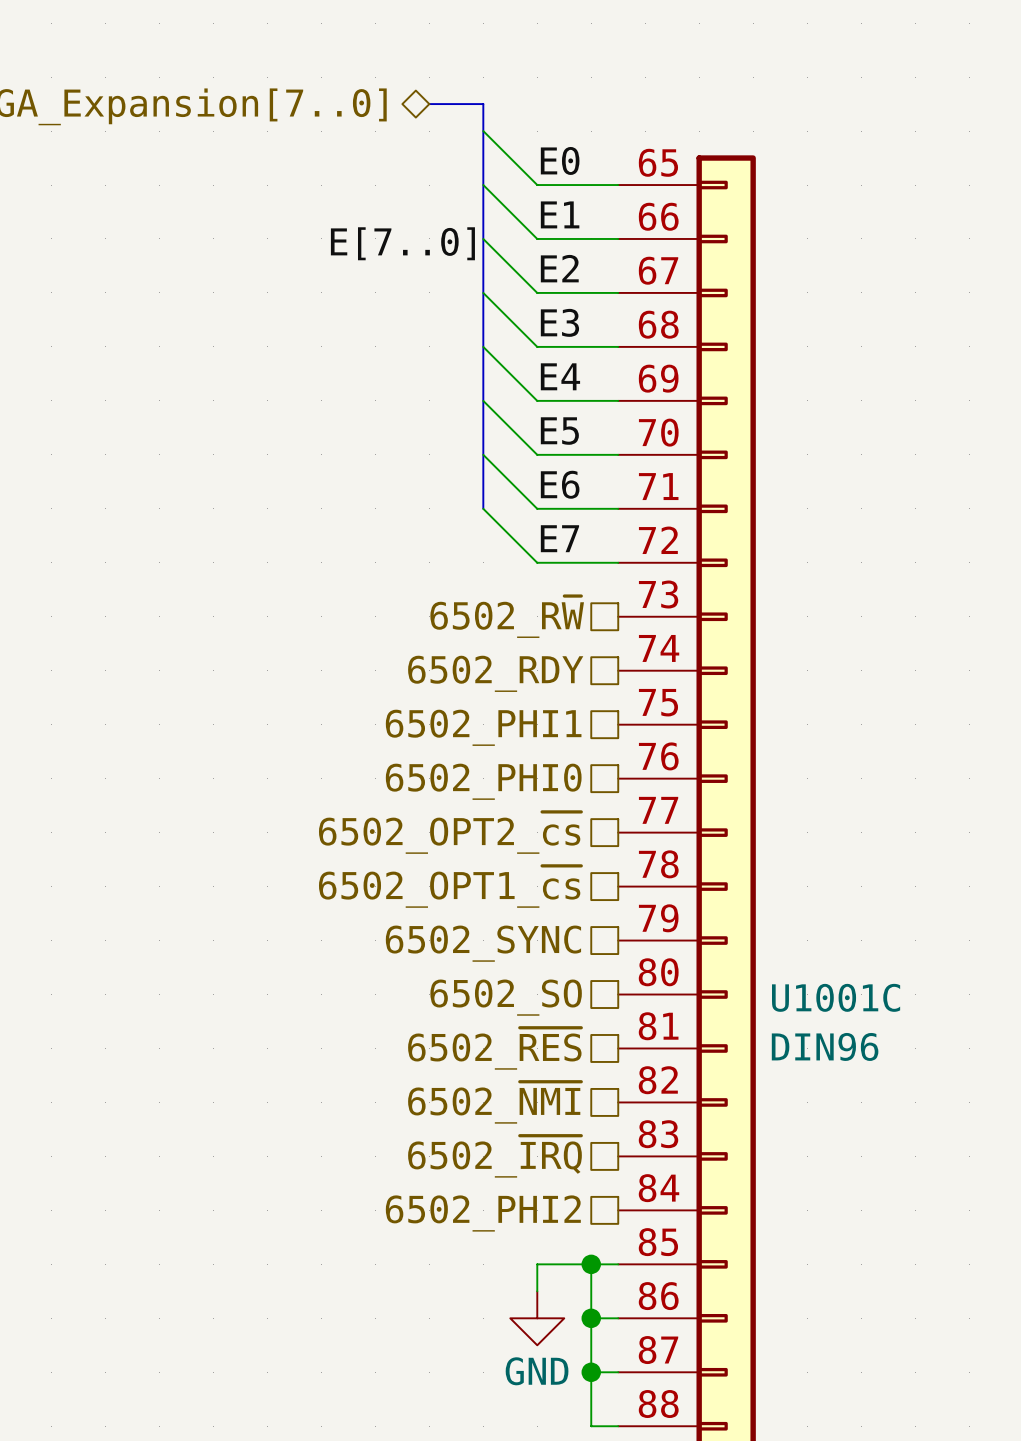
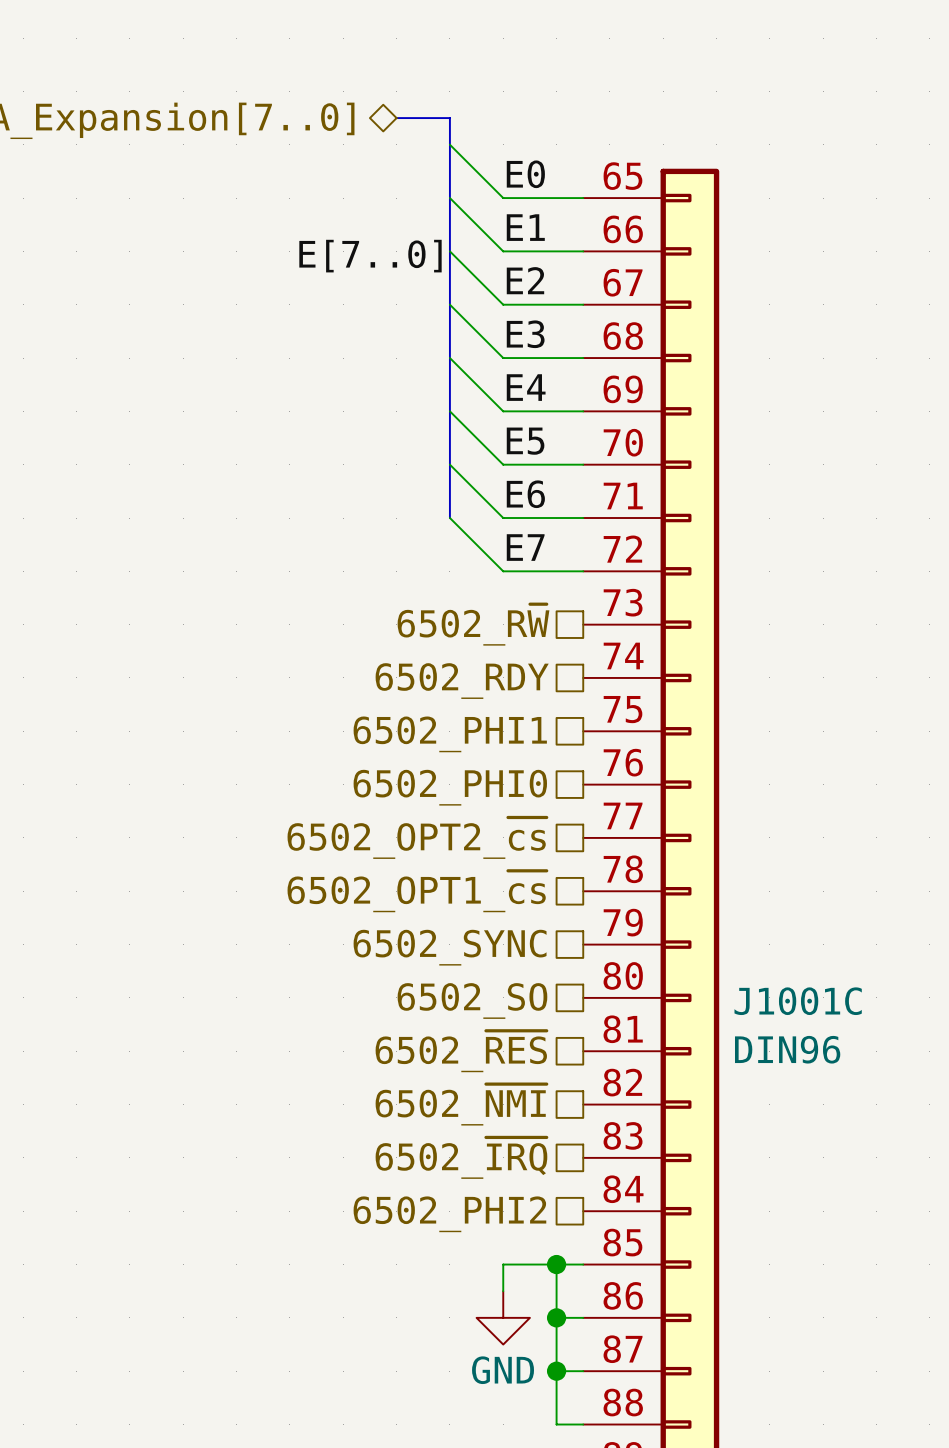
U1001C name: U1001C (836, 997) -> J1001C (798, 1001)

